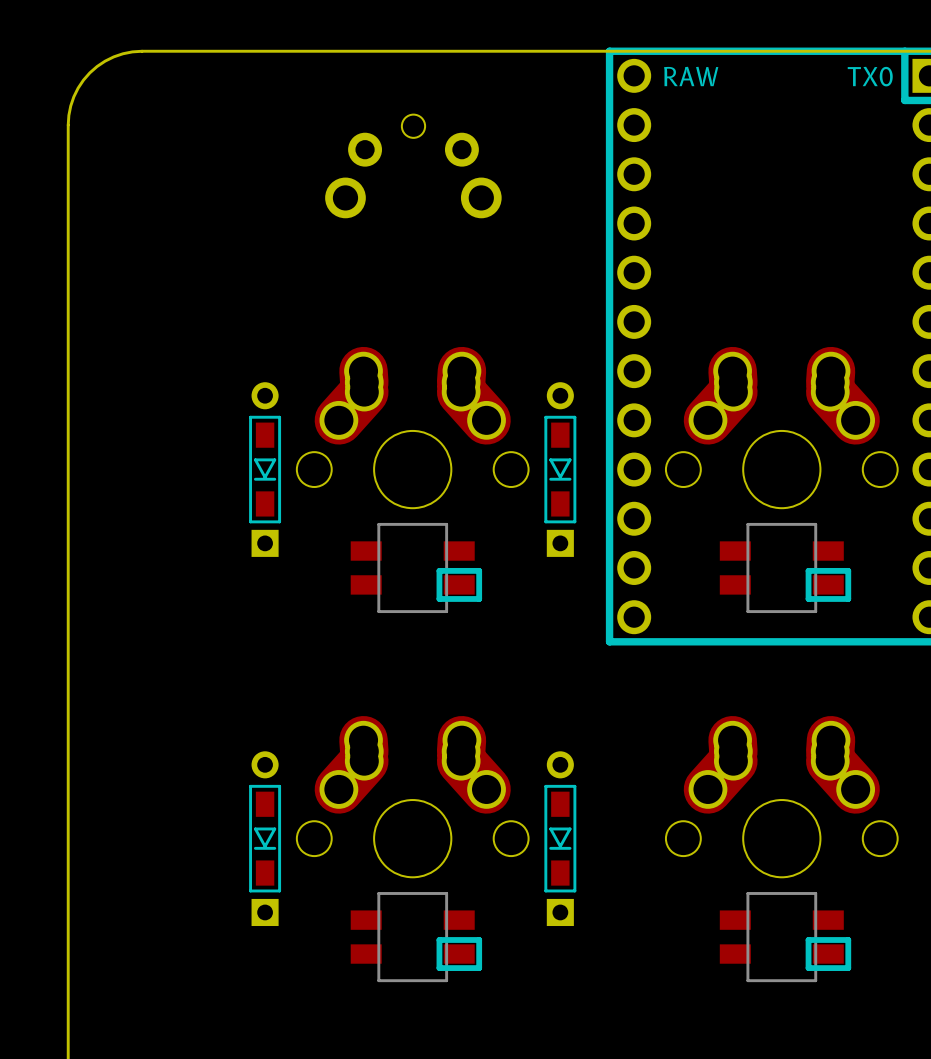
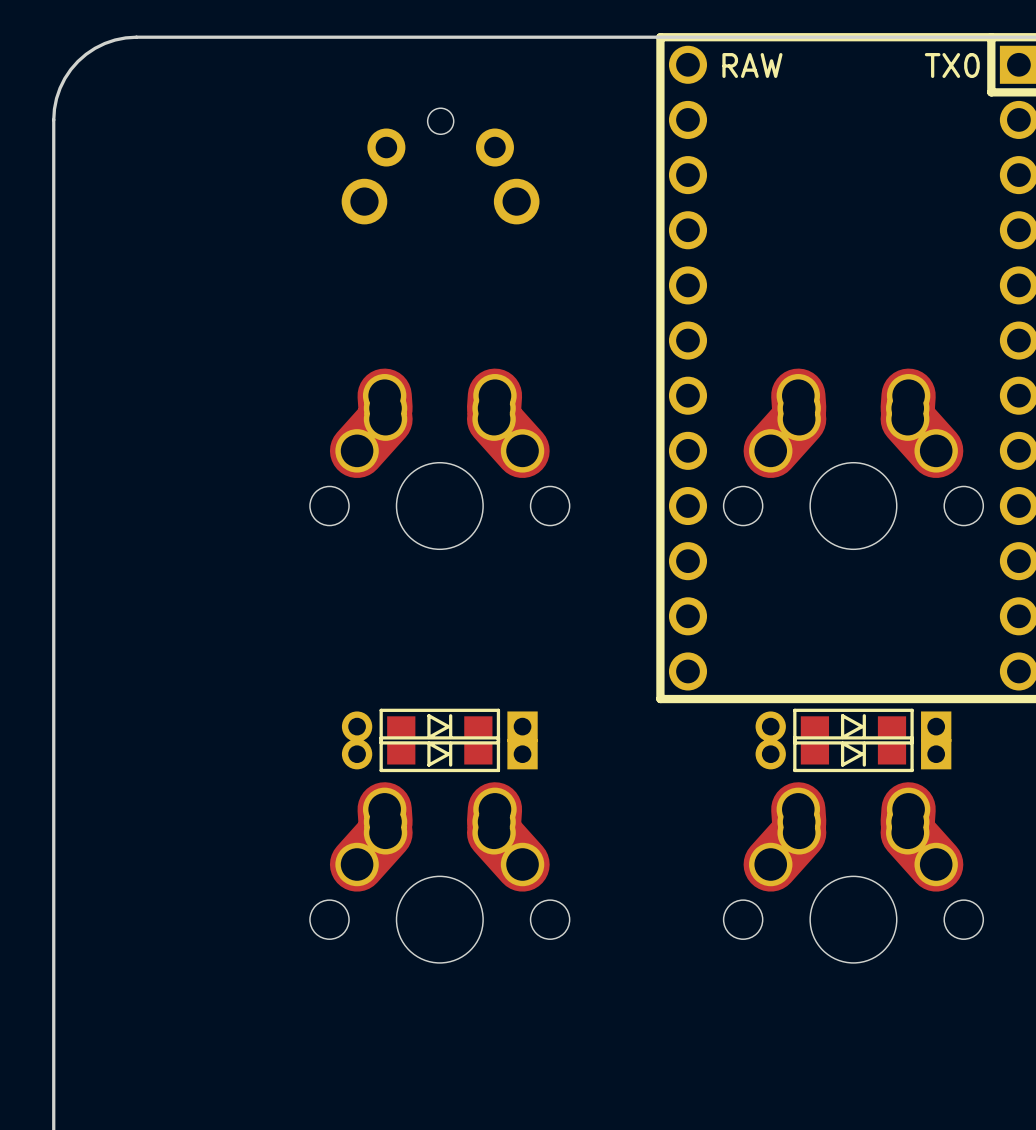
part: (265, 469) -> none
part: (560, 469) -> none
part: (416, 567) -> none
part: (785, 567) -> none
part: none -> (439, 726)
part: none -> (853, 726)
part: none -> (439, 754)
part: none -> (853, 754)
part: (265, 838) -> none
part: (560, 838) -> none
part: (416, 937) -> none
part: (785, 937) -> none

